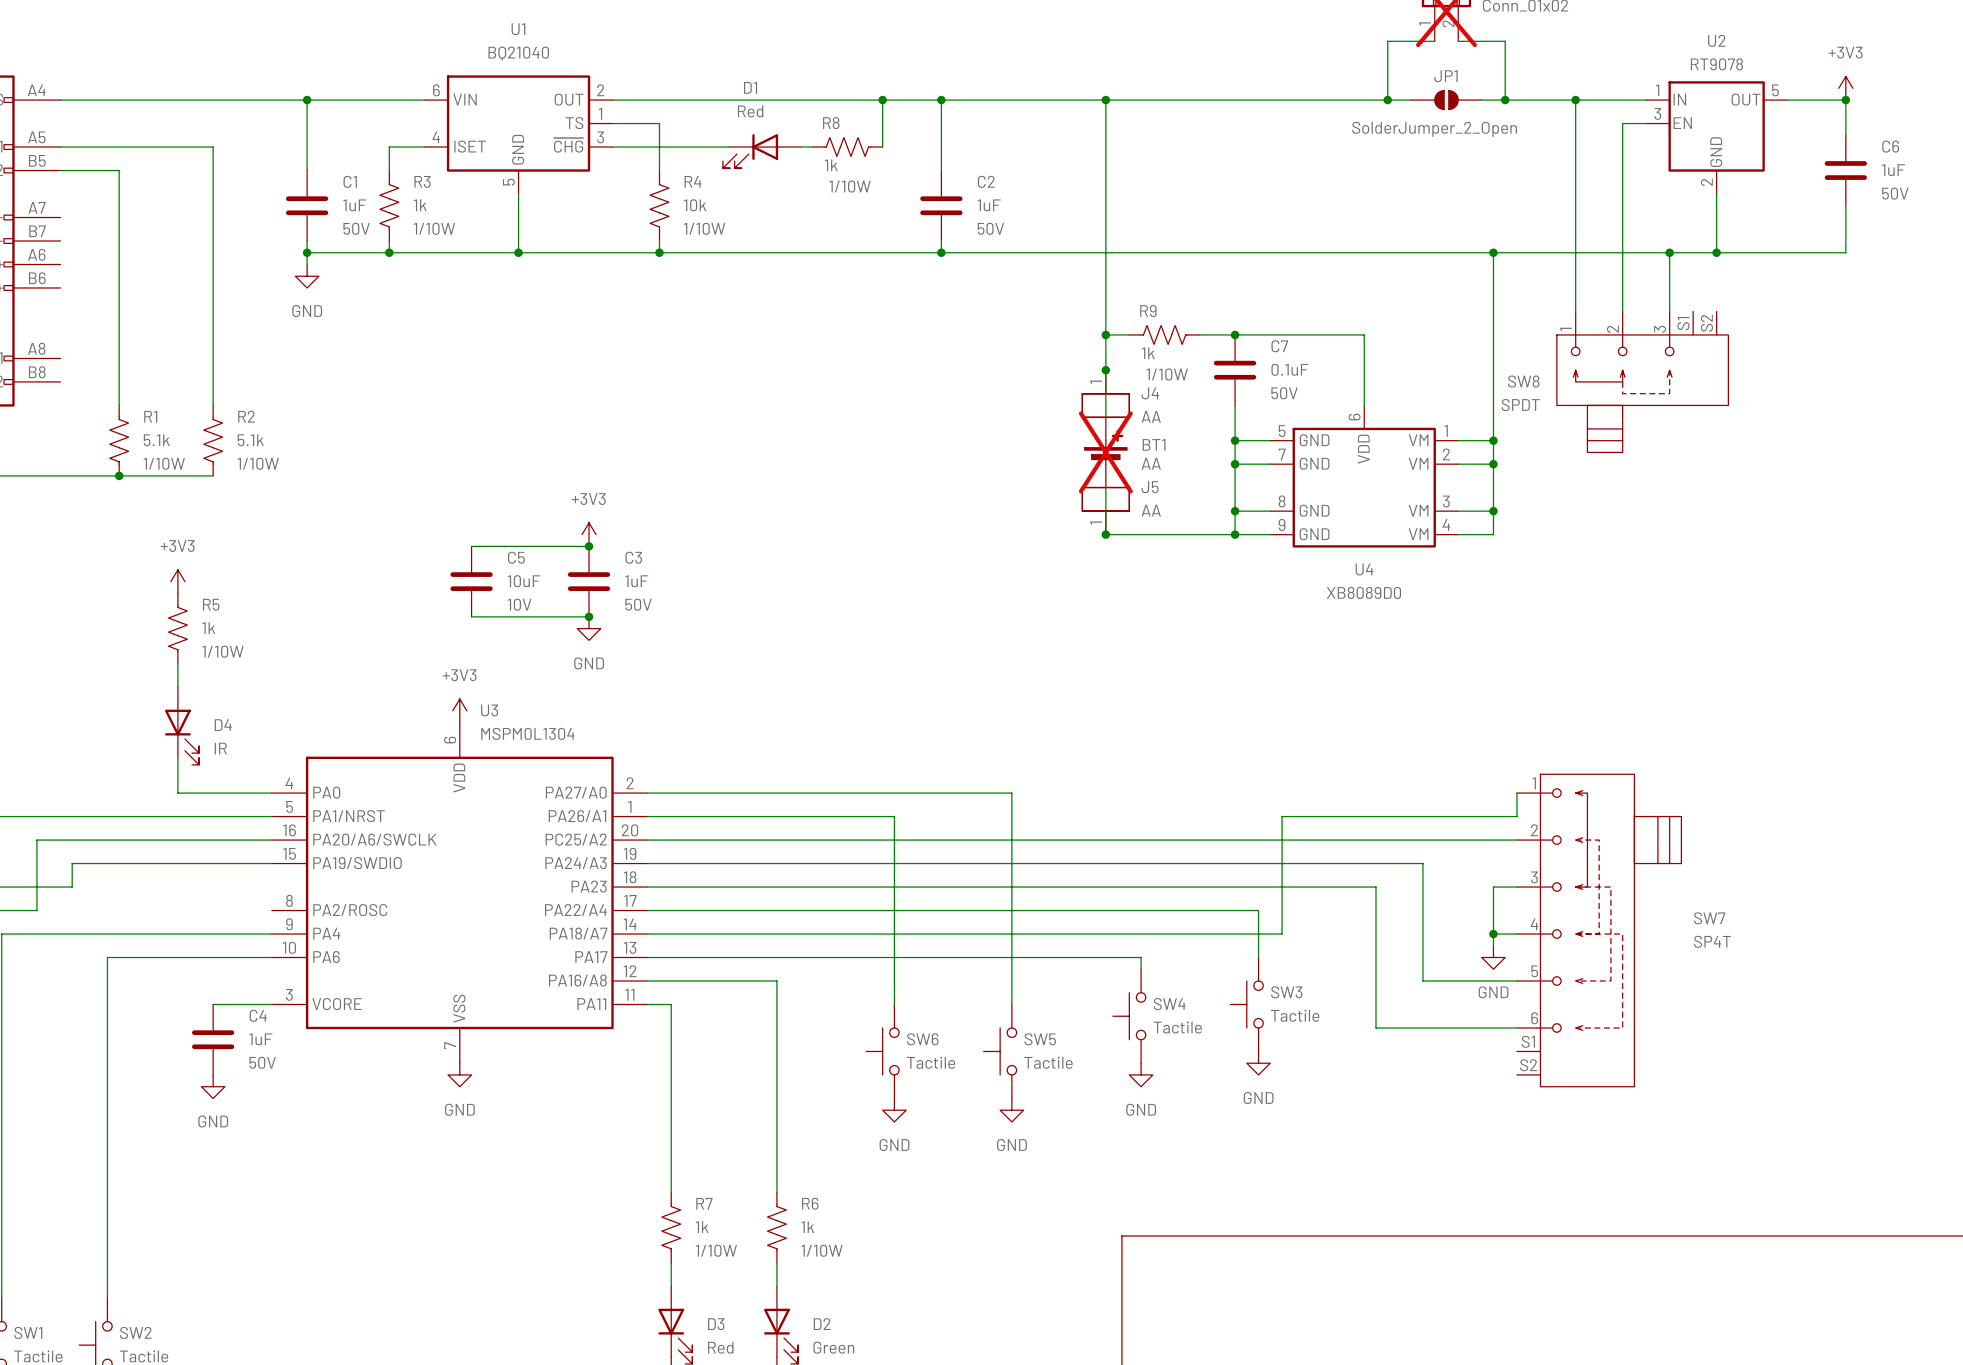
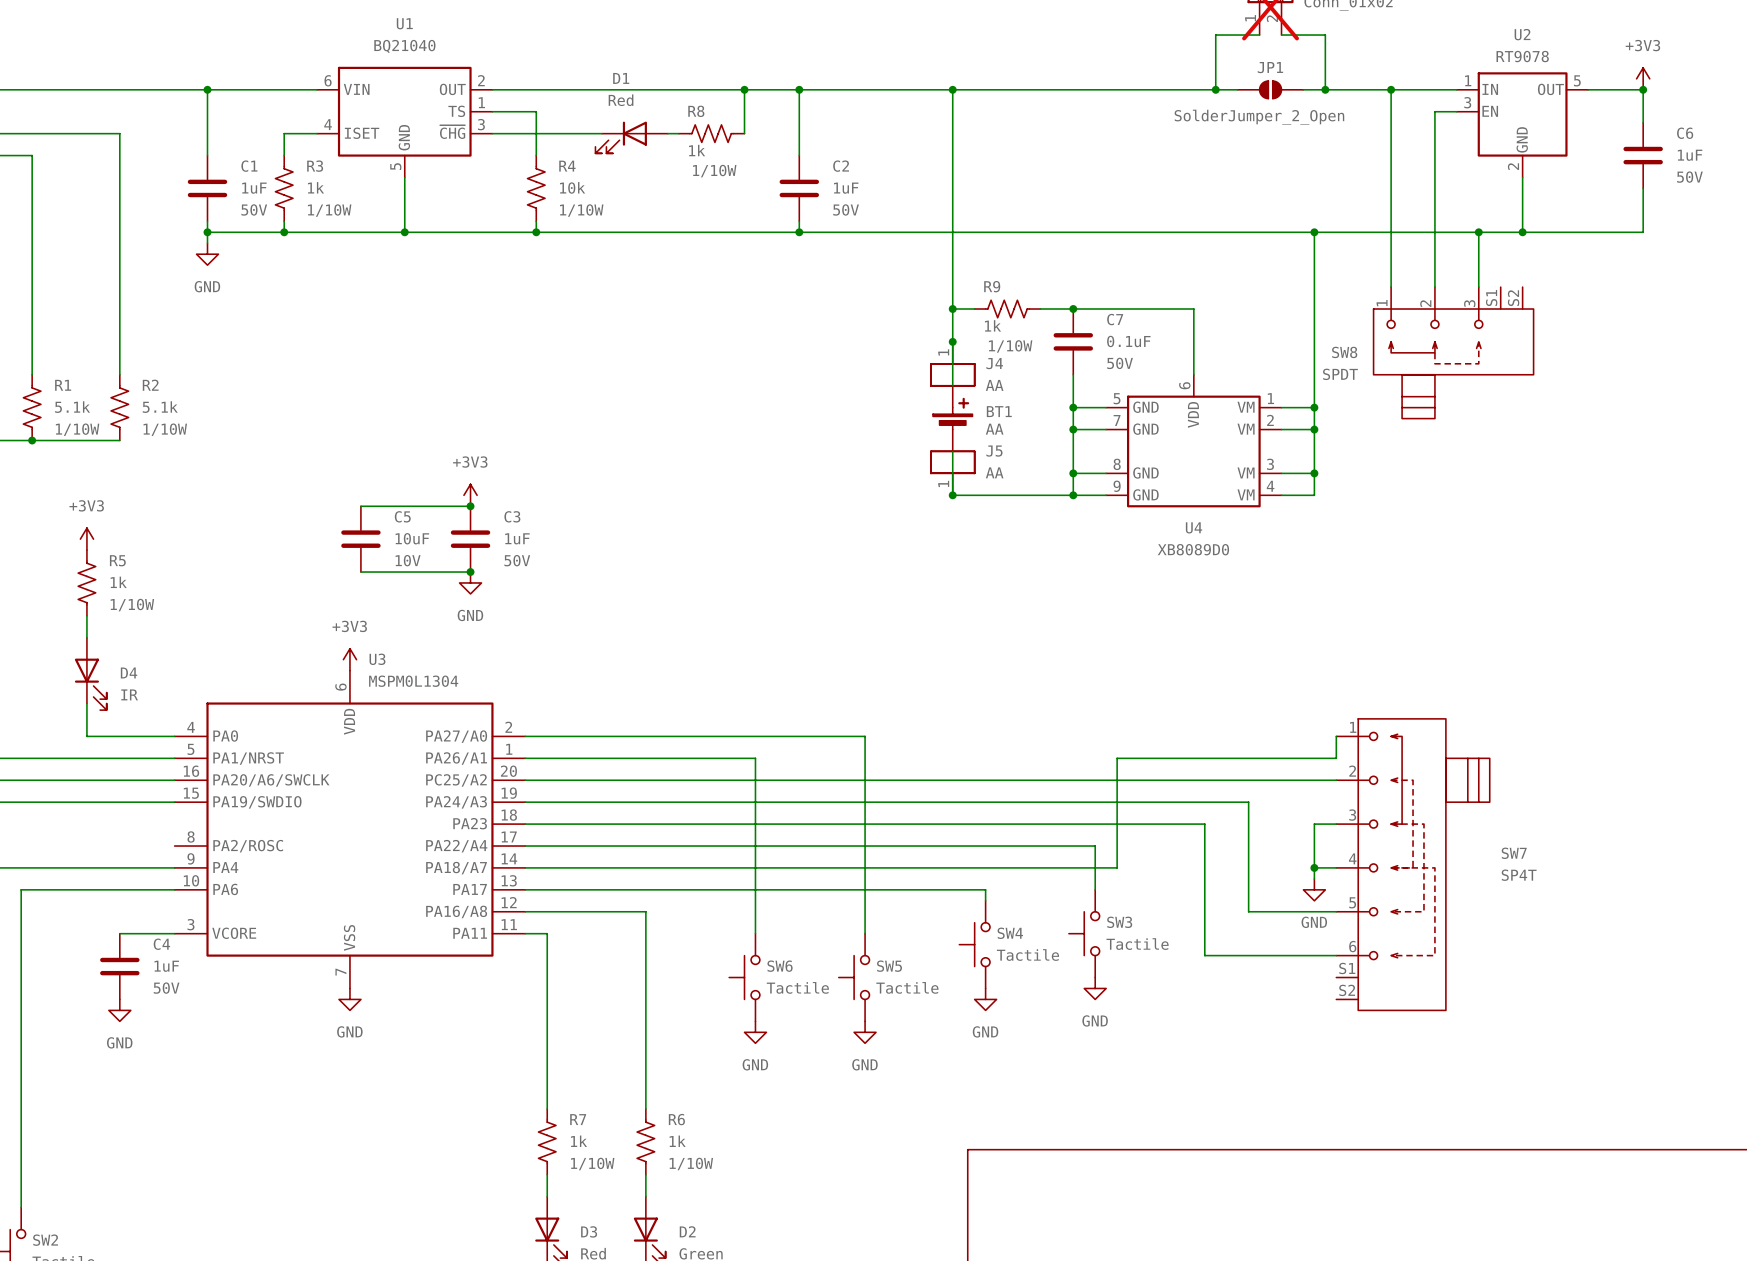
BT1 do-not-place cross: (1105, 452) -> none

